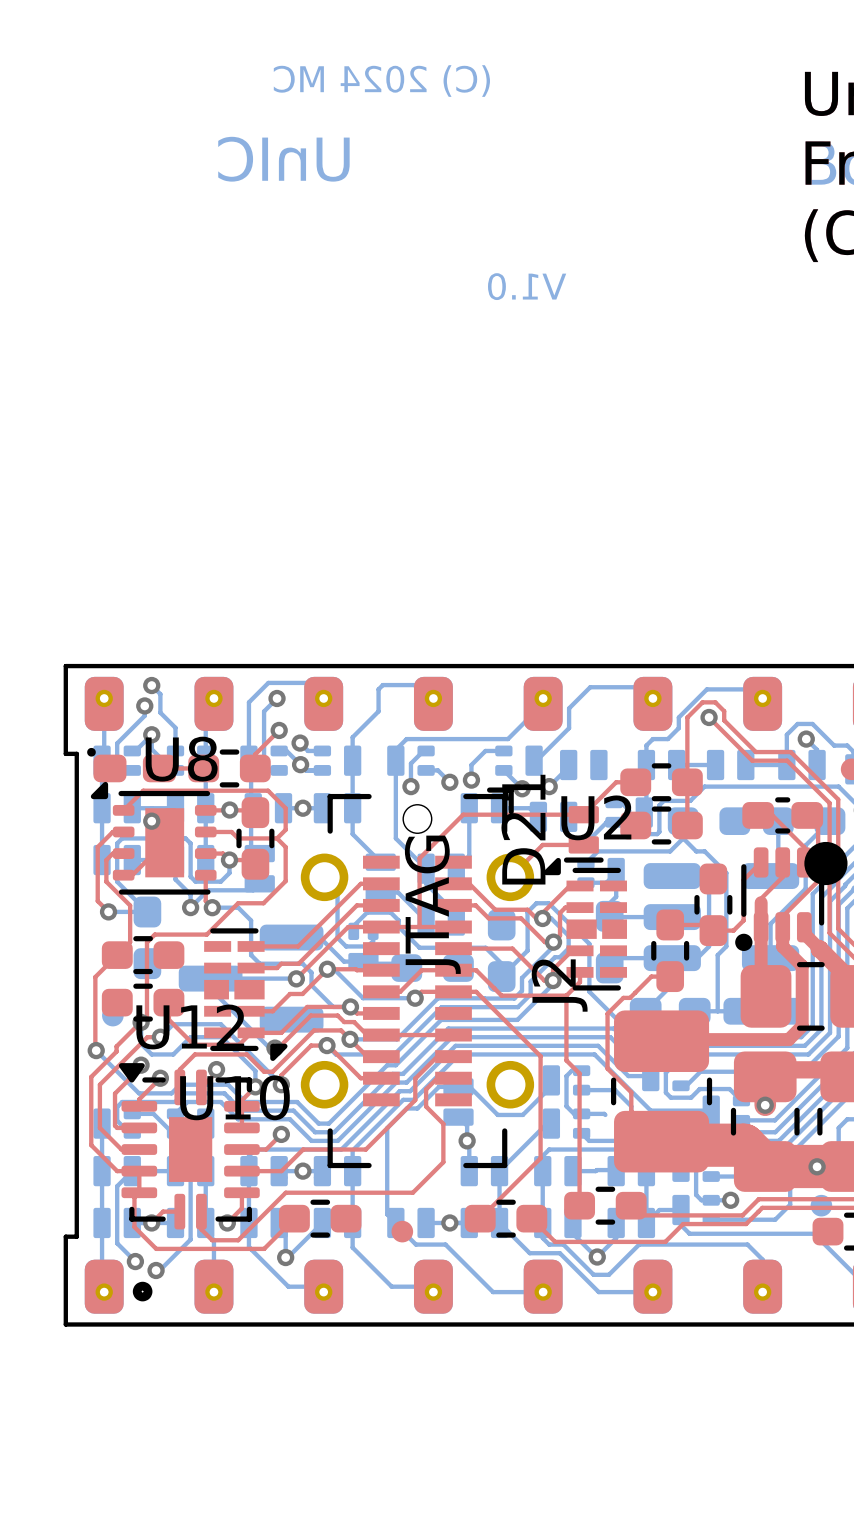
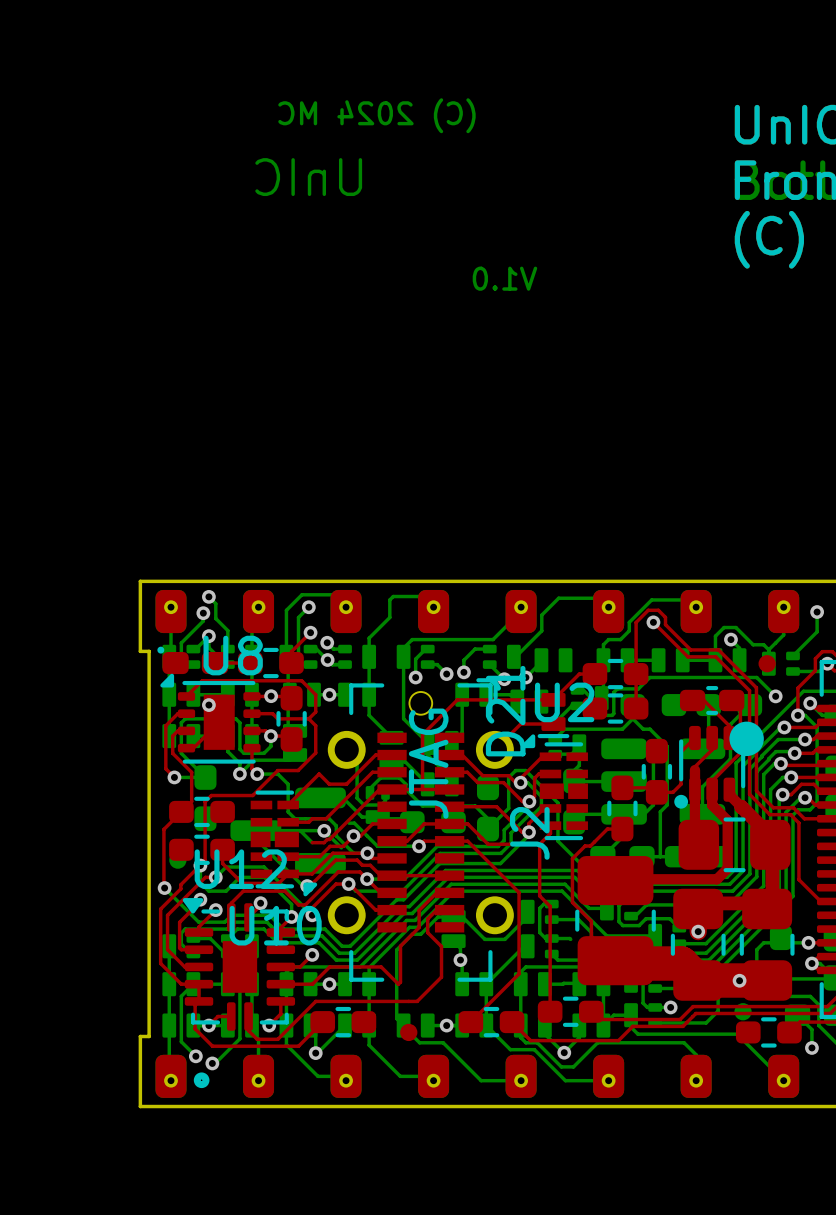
top track: (324, 920) (298, 946) (251, 946) -> (346, 784) (329, 784) (319, 773) (288, 805)
top track: (365, 927) (348, 927) (296, 978) -> (379, 789) (329, 839) (324, 842) (312, 842)
via position: (327, 969) -> (353, 836)
top track: (356, 970) (327, 969) (302, 993) (289, 993) (272, 1011) -> (372, 823) (360, 836) (353, 836) (343, 846) (330, 846) (319, 856) (305, 856)
bottom track: none -> (300, 830) (312, 842)
top track: (391, 1123) (365, 1149) -> (400, 946) (400, 982) (398, 984) (379, 966)

